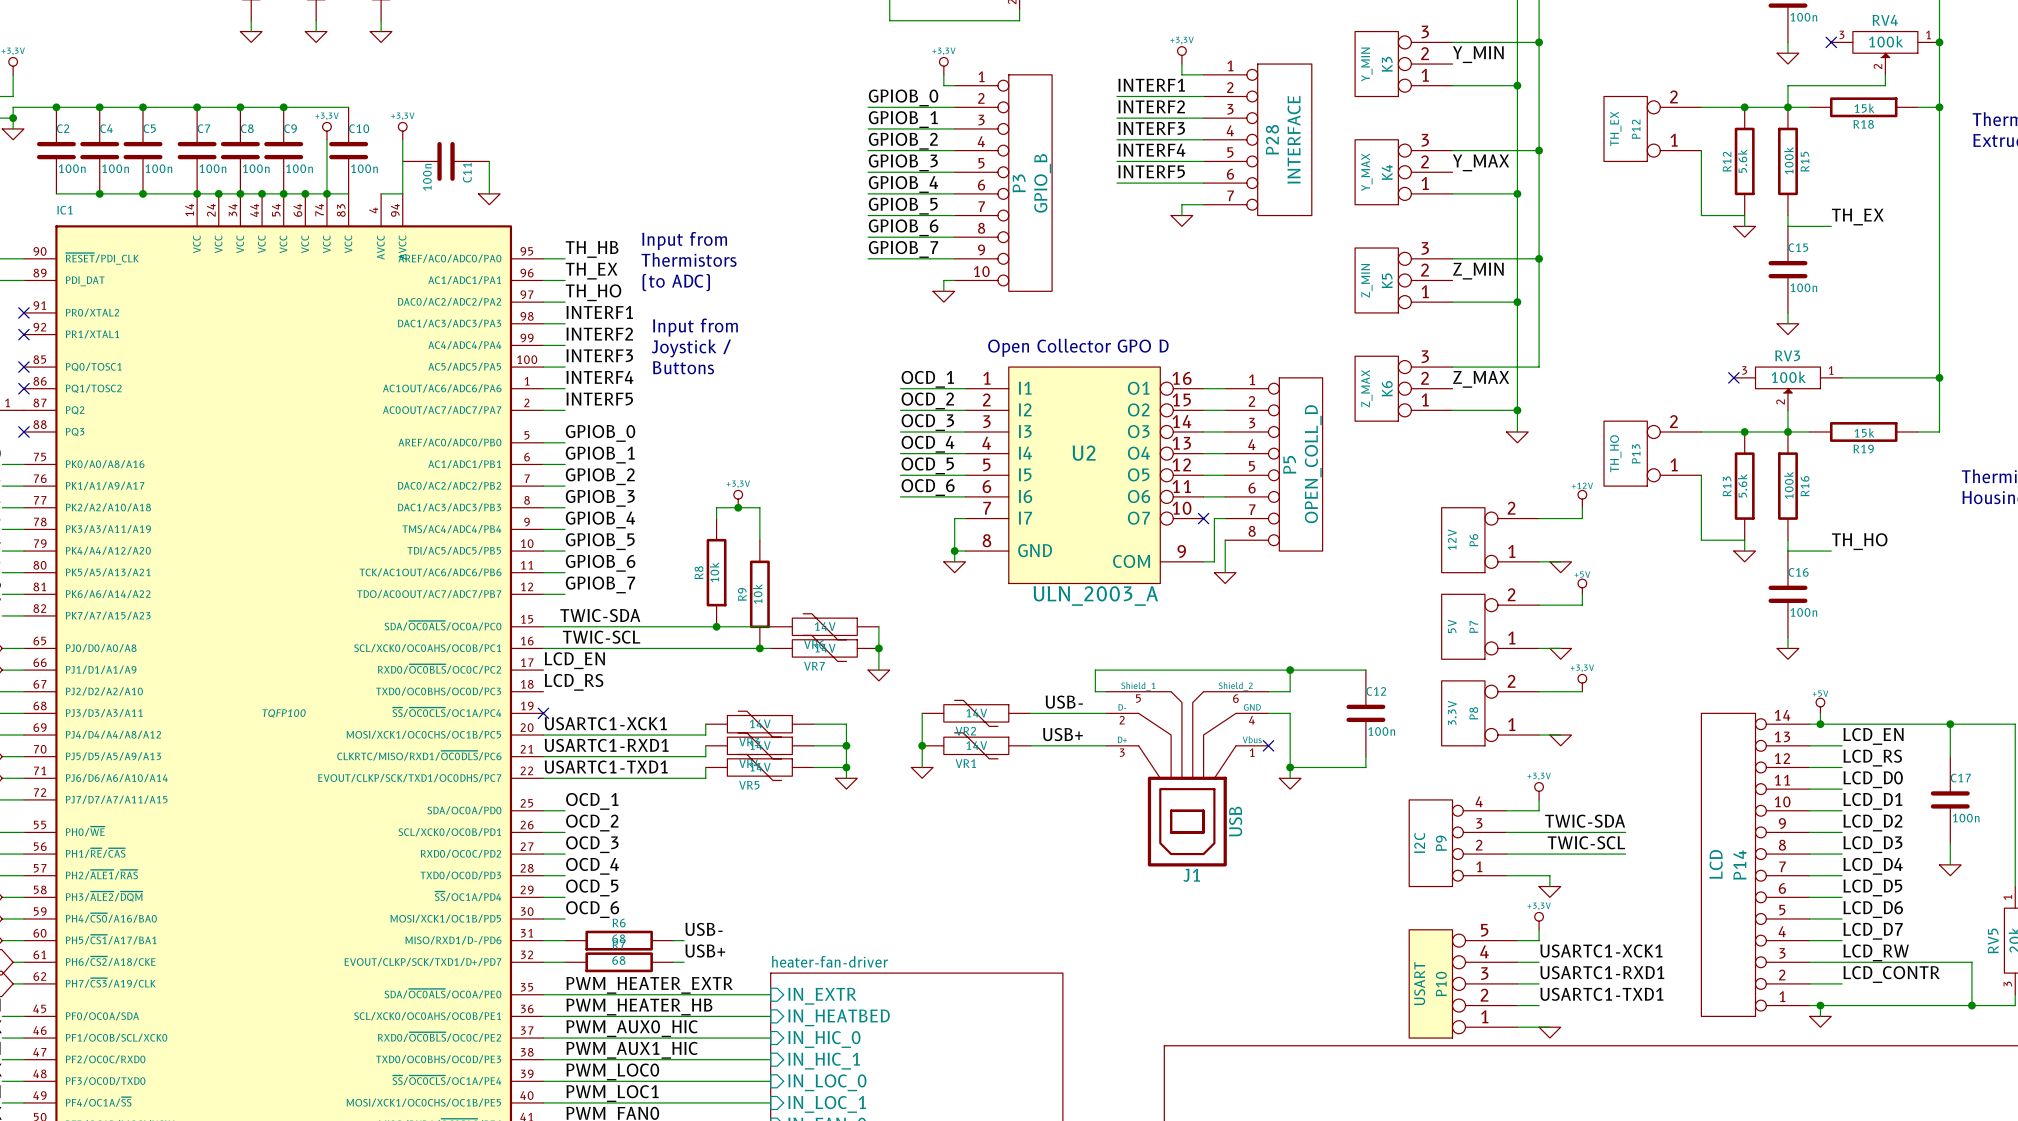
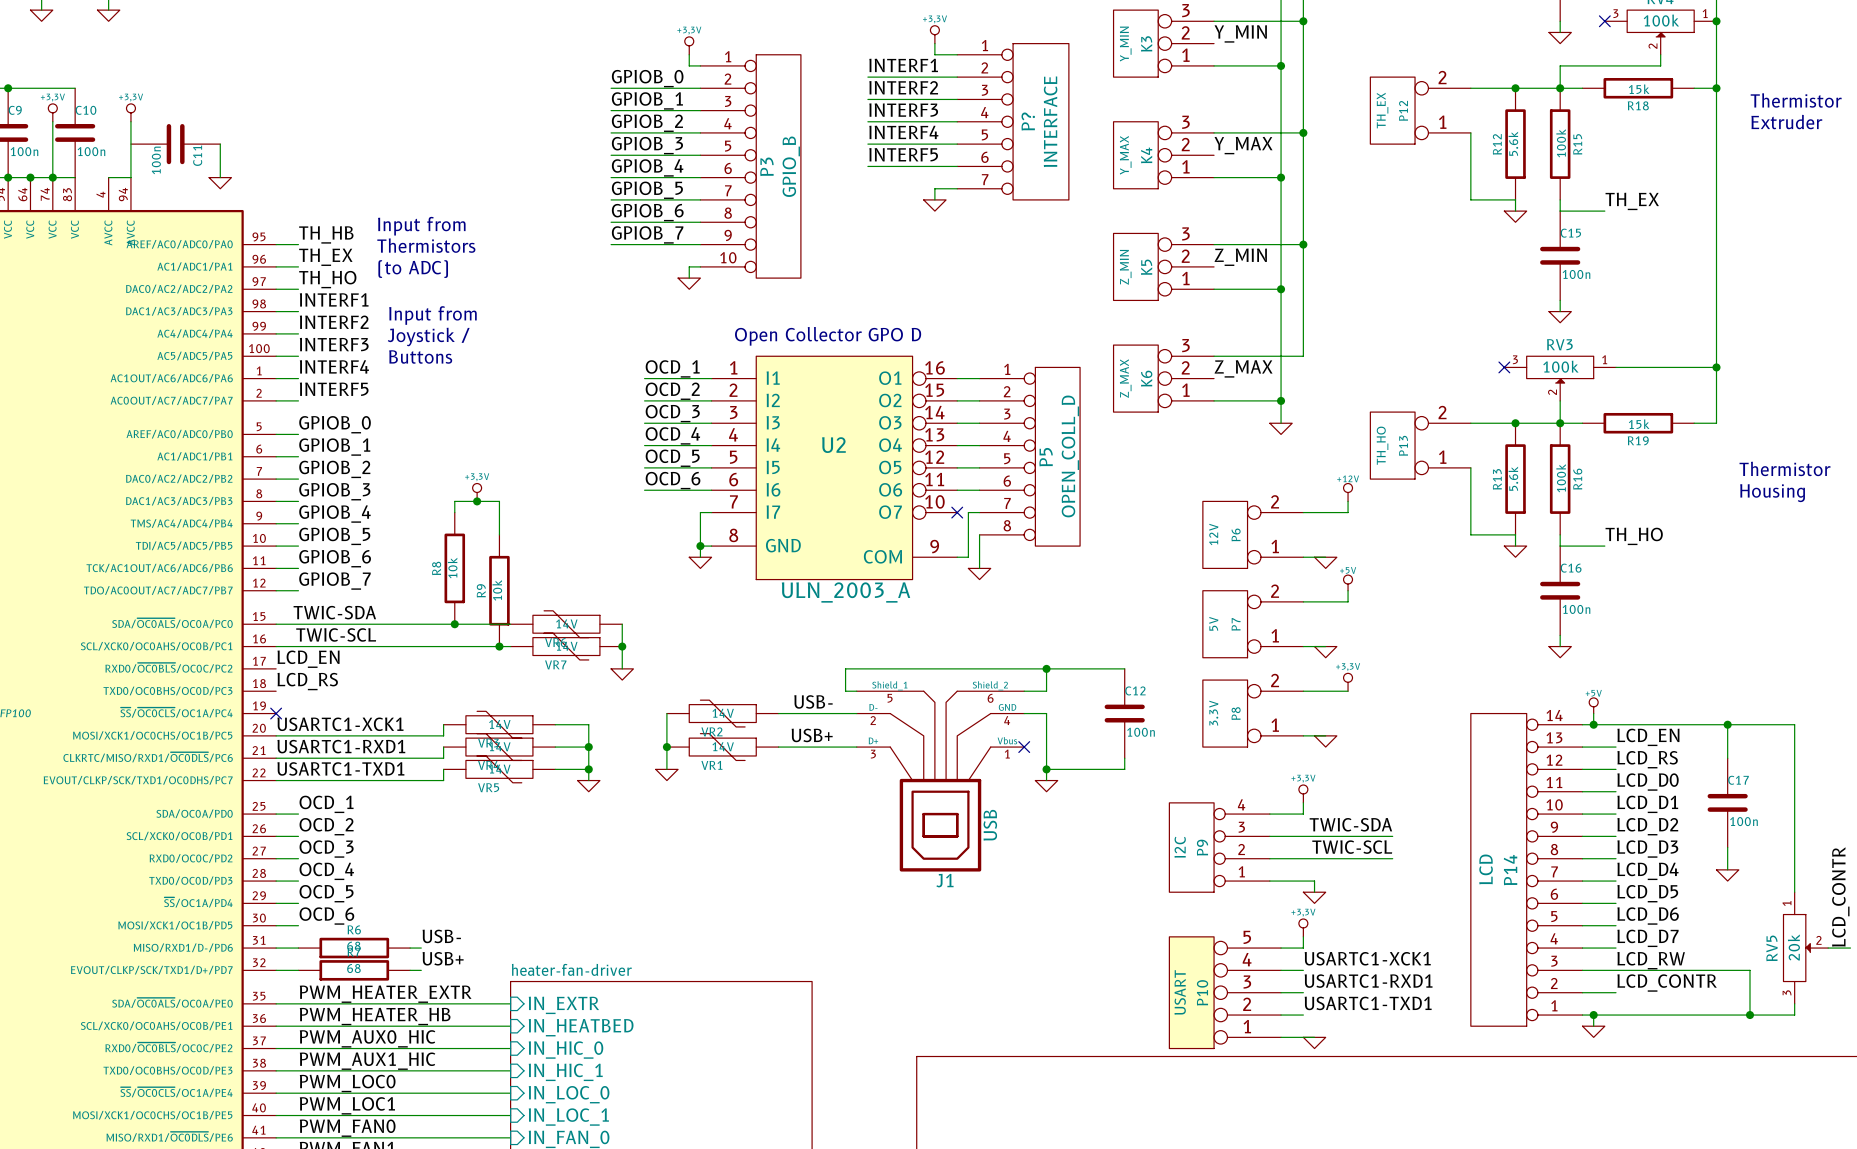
P28 name: P28 (1272, 139) -> P? (1028, 121)

